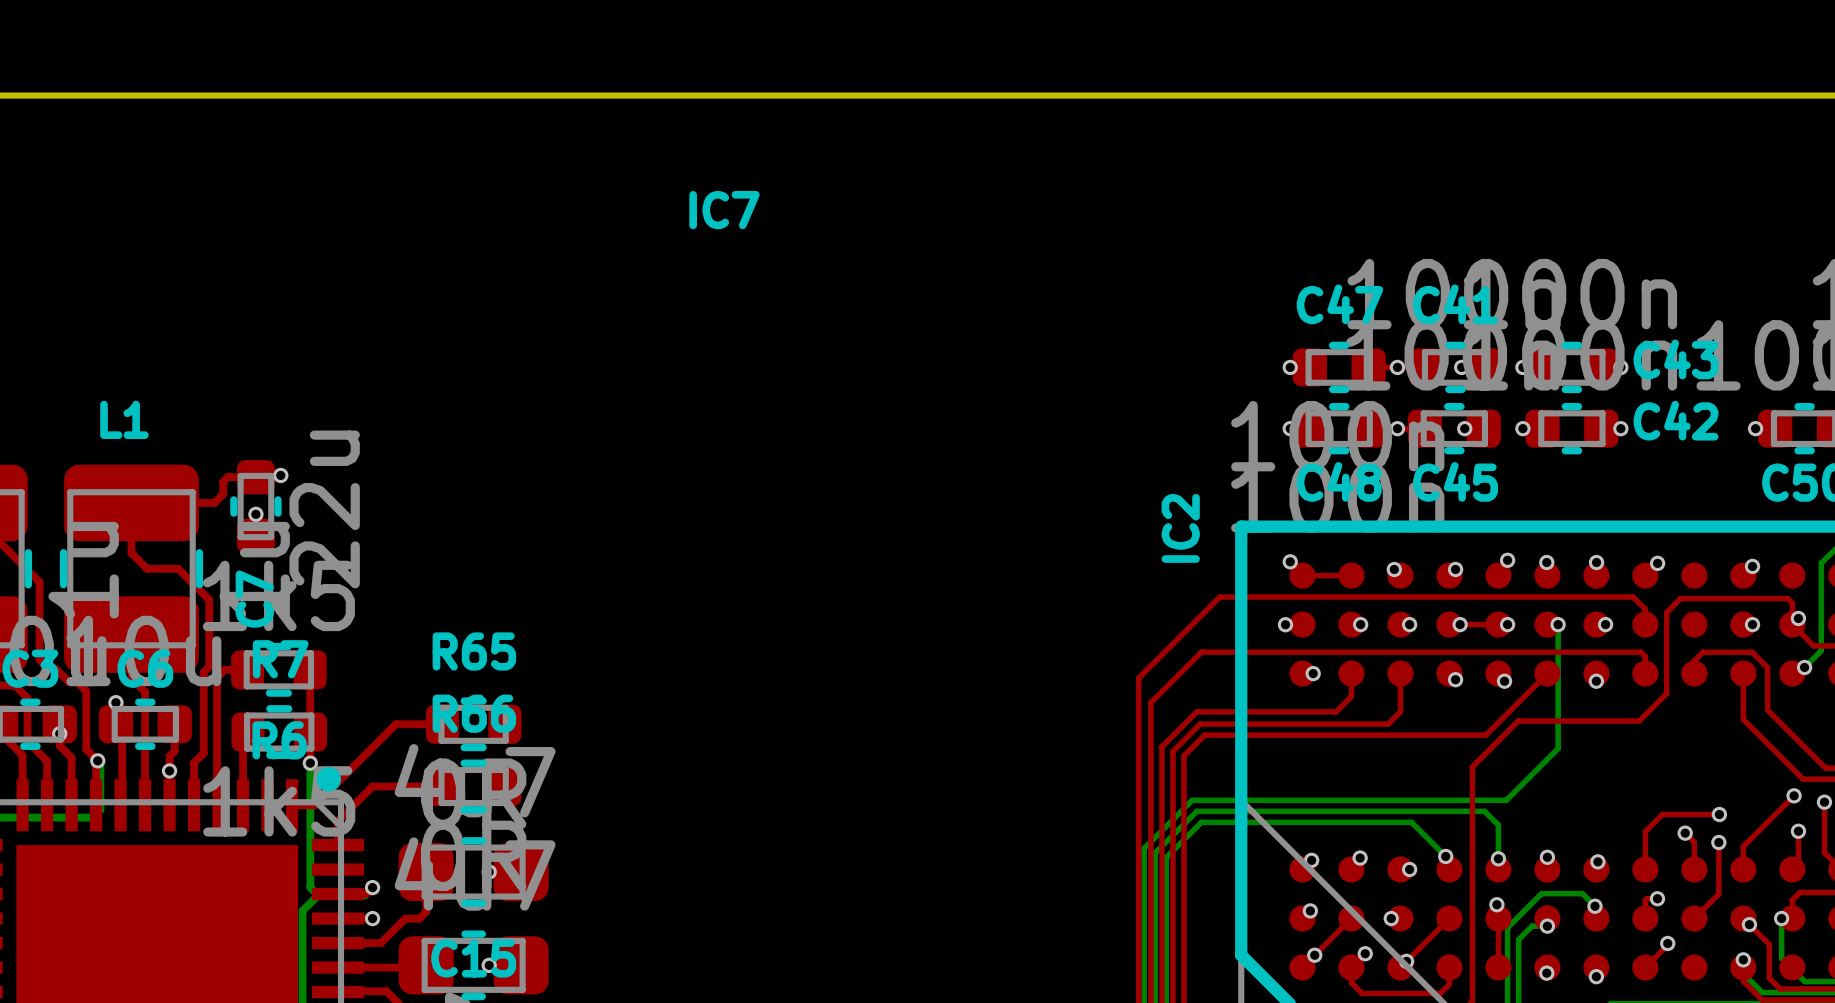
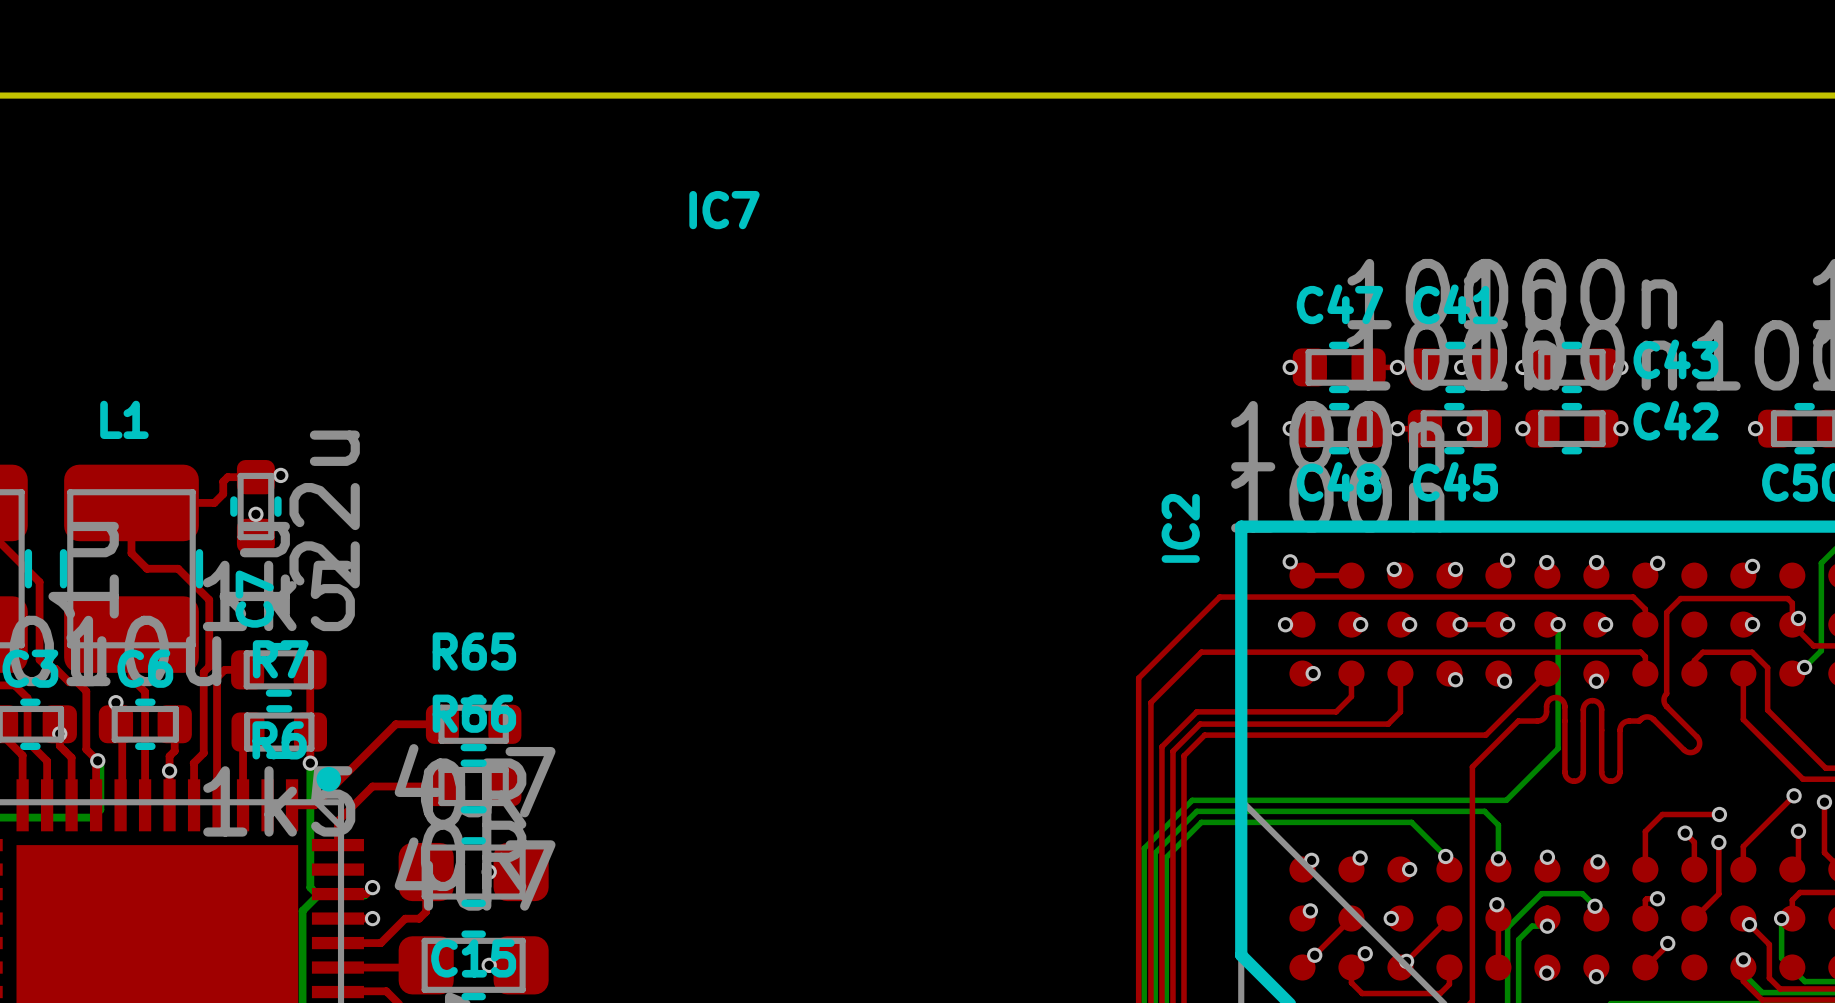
top track: (1666, 693) (1640, 719) -> (1666, 693) (1664, 698) (1664, 704) (1698, 738) (1699, 744) (1696, 749) (1691, 752) (1685, 751) (1651, 717) (1645, 717) (1640, 719)
top track: (1537, 721) (1629, 721) -> (1537, 721) (1545, 716) (1546, 704) (1550, 699) (1556, 697) (1563, 701) (1564, 706) (1565, 773) (1567, 778) (1574, 781) (1579, 779) (1583, 773) (1583, 709) (1585, 703) (1594, 700) (1601, 707) (1601, 773) (1607, 780) (1614, 780) (1619, 775) (1620, 729) (1622, 723) (1629, 721)

